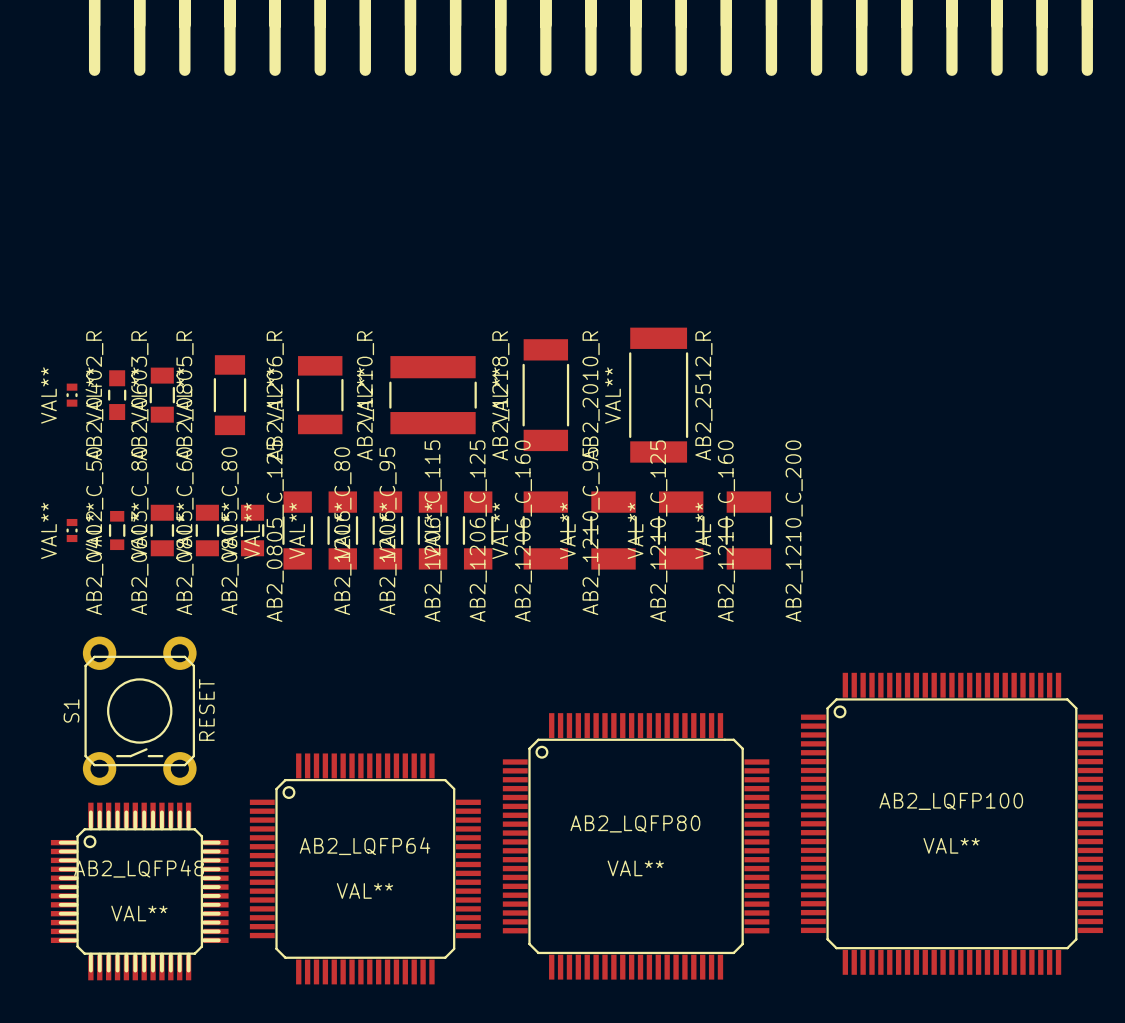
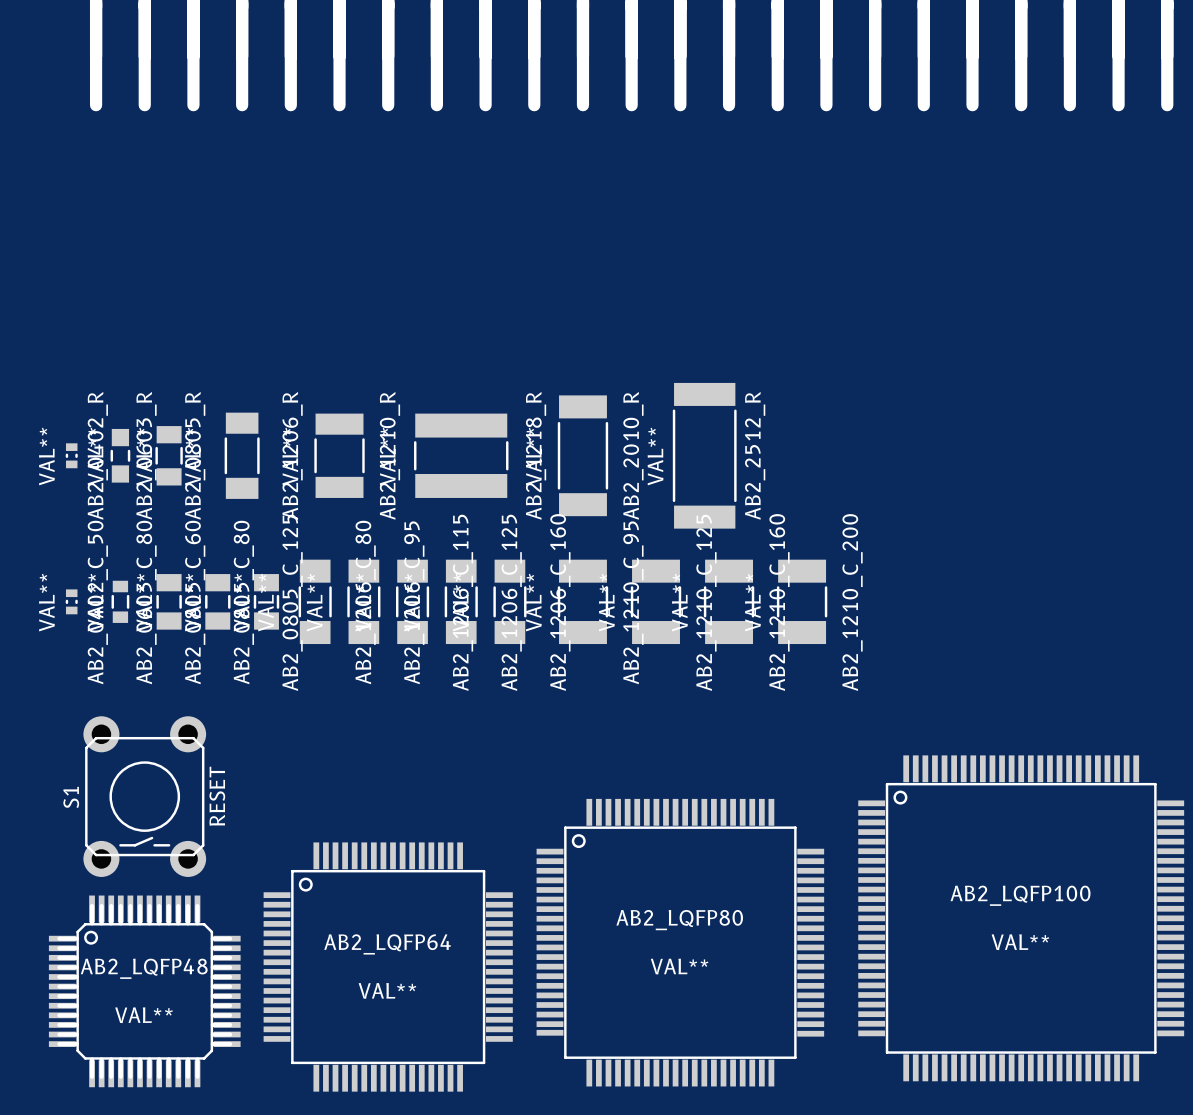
AB2_LQFP100 footprint: [800, 672, 1103, 975] -> [858, 755, 1185, 1082]
AB2_LQFP80 footprint: [502, 713, 770, 980] -> [536, 798, 825, 1087]
AB2_LQFP64 footprint: [249, 753, 481, 985] -> [263, 842, 513, 1092]

